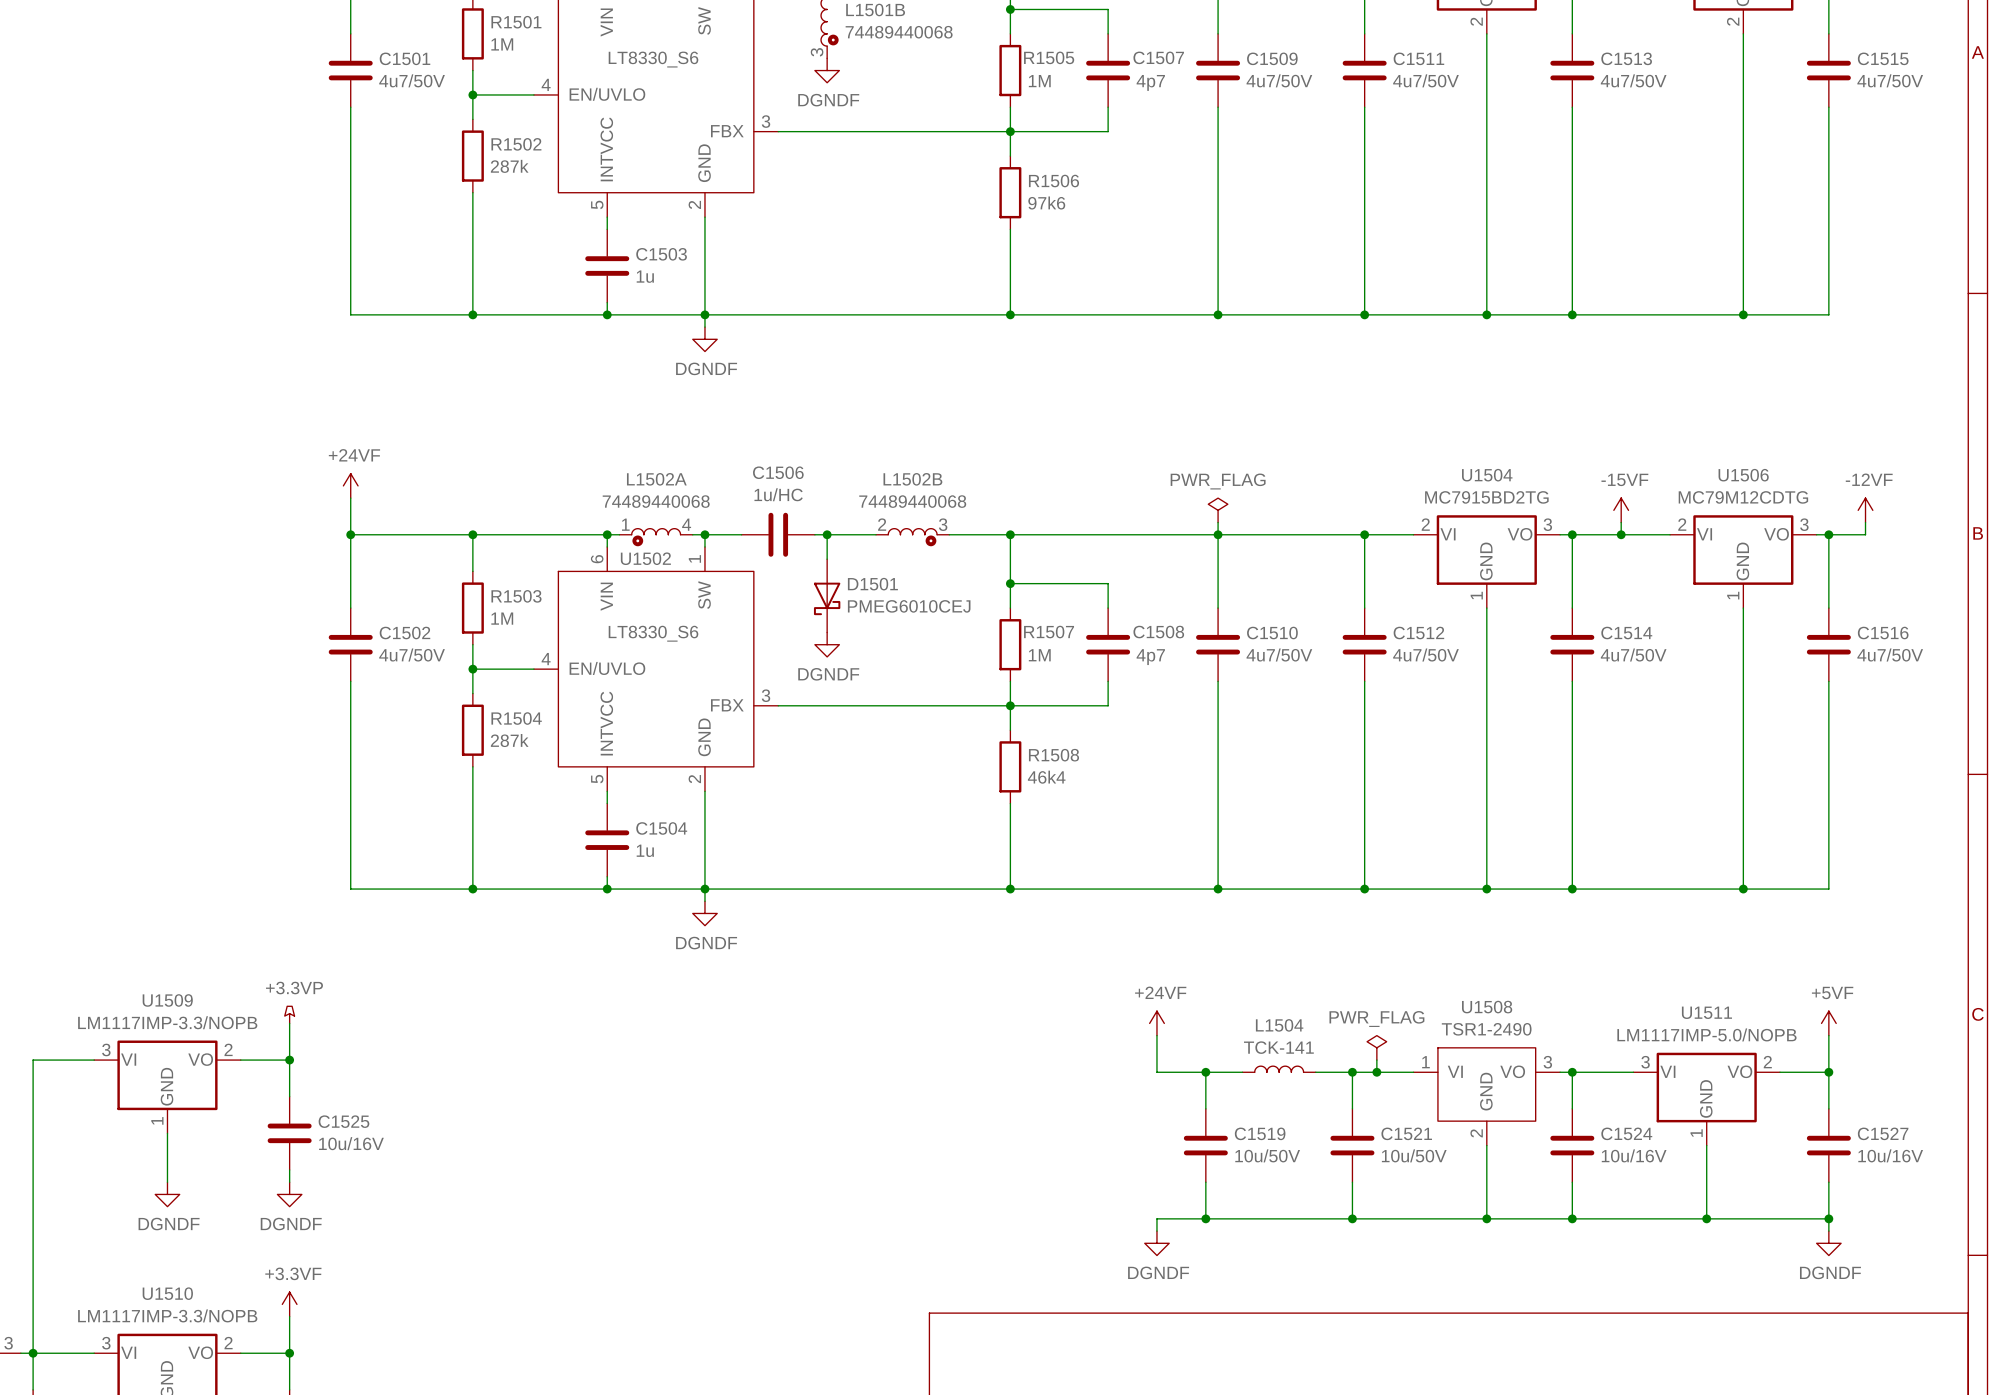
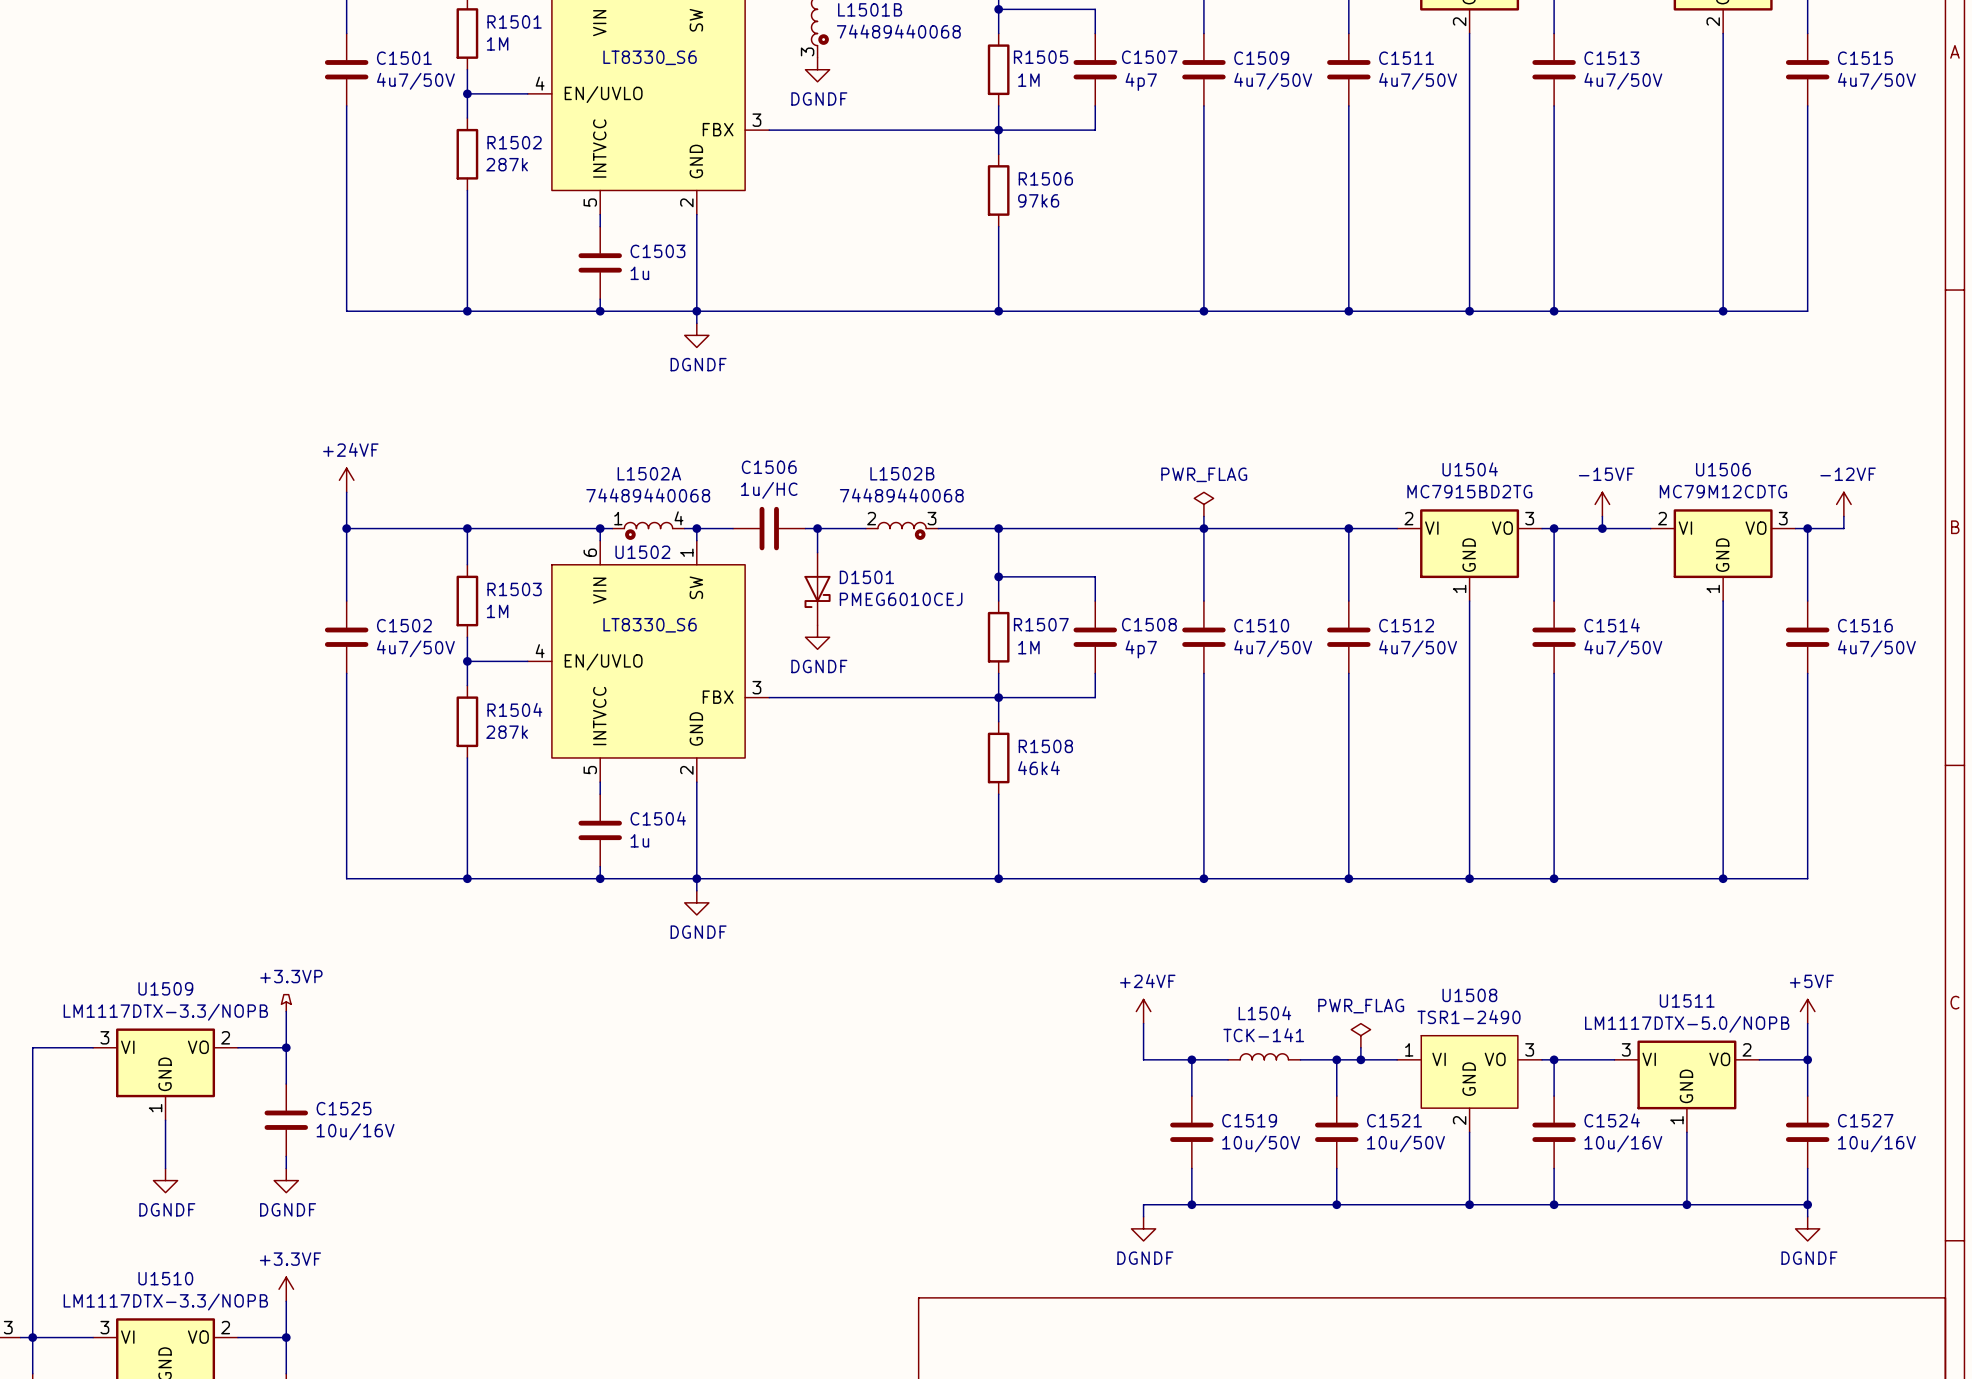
U1509 value: LM1117IMP-3.3/NOPB (167, 1022) -> LM1117DTX-3.3/NOPB (165, 1012)
U1511 value: LM1117IMP-5.0/NOPB (1706, 1034) -> LM1117DTX-5.0/NOPB (1687, 1024)
U1510 value: LM1117IMP-3.3/NOPB (167, 1315) -> LM1117DTX-3.3/NOPB (165, 1302)

